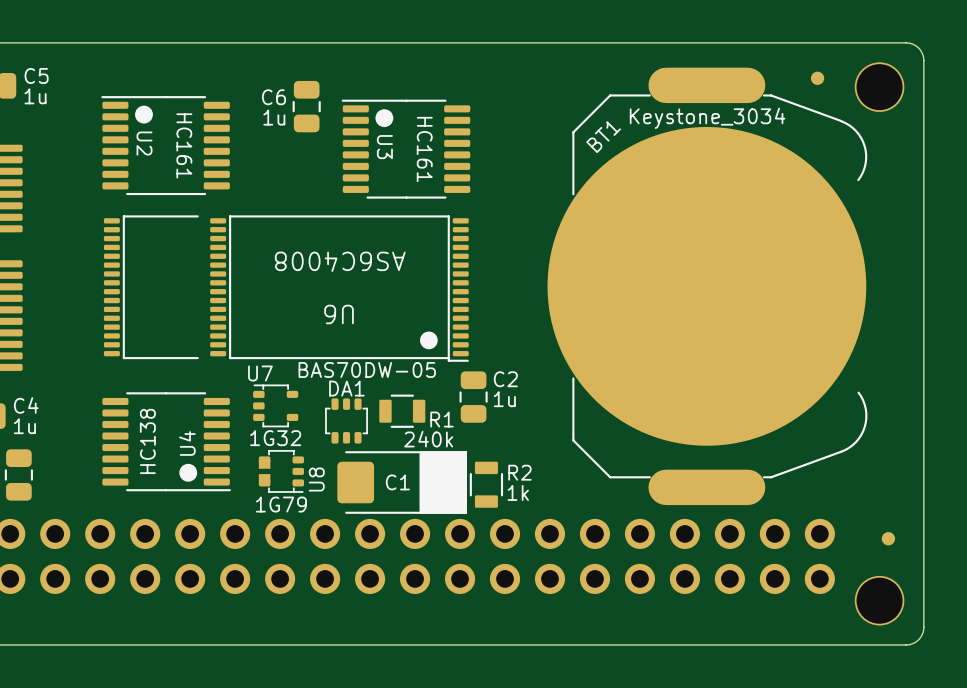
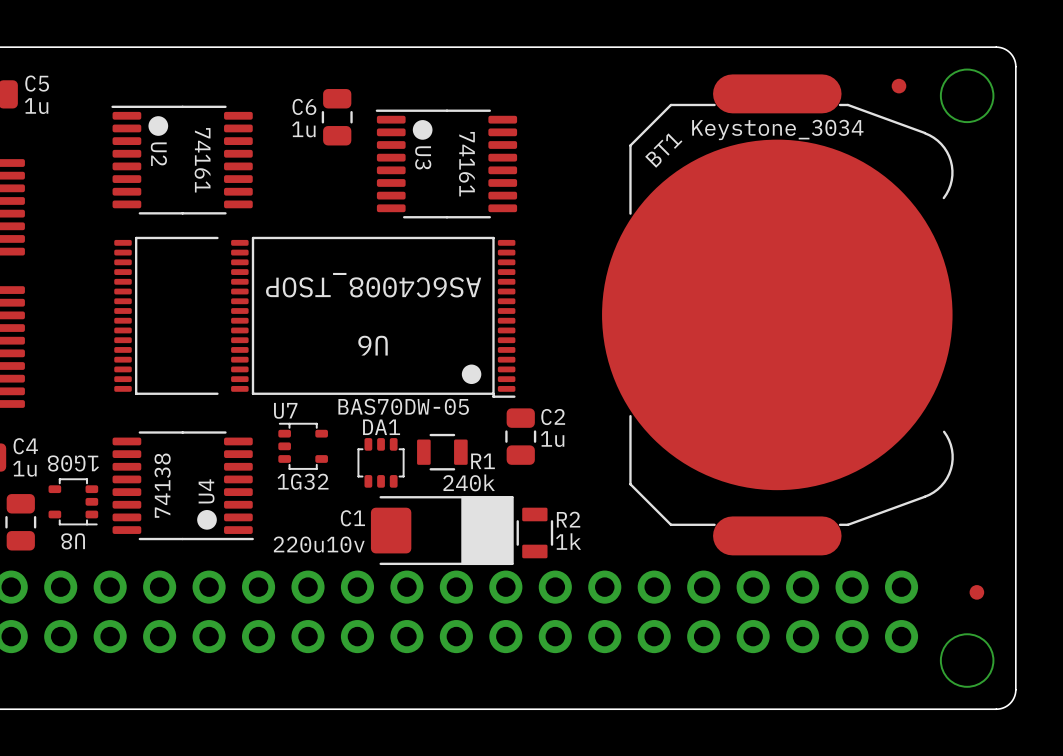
U2 value: HC161 (184, 145) -> 74161 (202, 160)
U3 value: HC161 (424, 149) -> 74161 (466, 164)
U6 value: AS6C4008 (340, 261) -> AS6C4008_TSOP (373, 285)
U4 value: HC138 (147, 441) -> 74138 (162, 485)
part: (264, 471) -> none
U8 position: (281, 471) -> (73, 501)
U8 name rotation: 0° (316, 479) -> 90° counterclockwise (73, 541)
U8 name position: U8 (316, 479) -> U8 (73, 541)
C1 name position: C1 (397, 482) -> C1 (352, 518)
C1 value: none -> 220u10v (319, 544)
U8 value: 1G79 (281, 504) -> 1G08 (73, 463)

